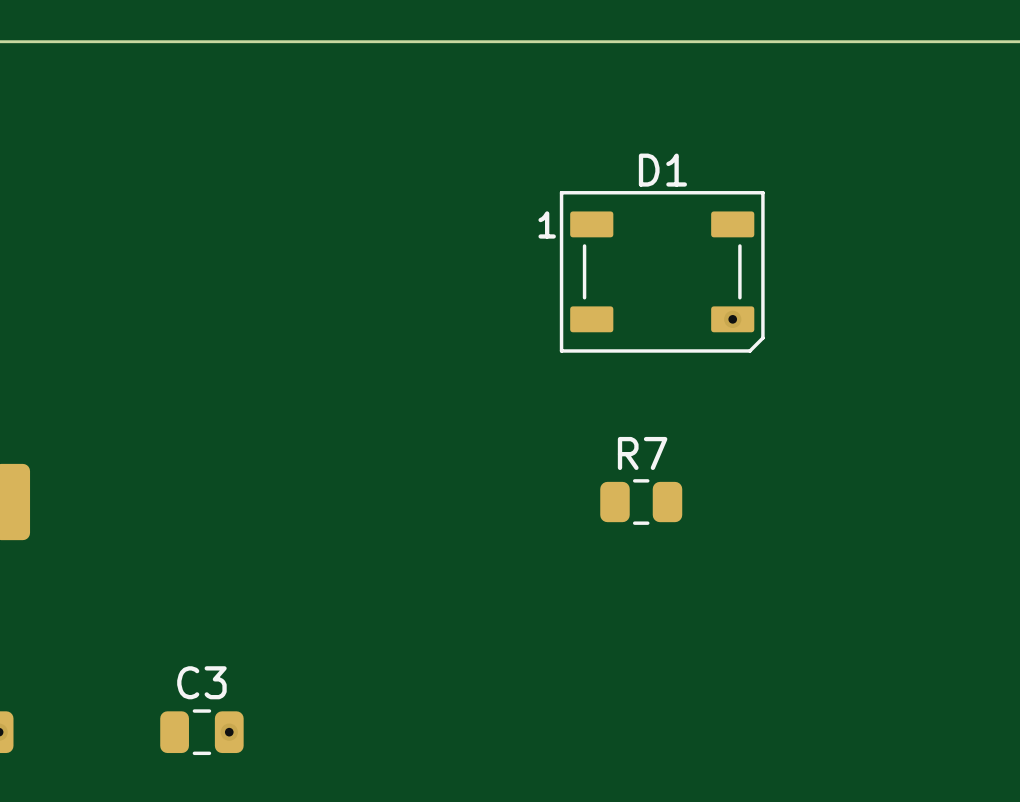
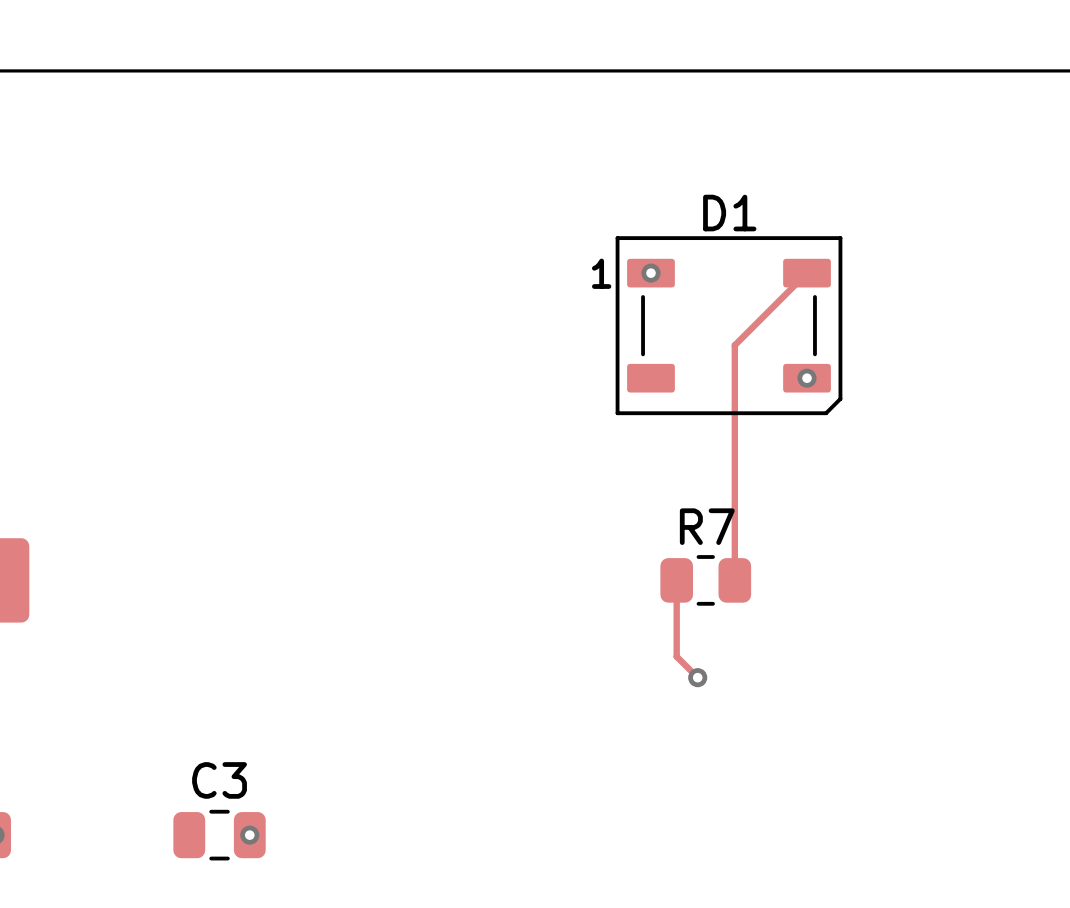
via: none -> (650, 273)
track: none -> (807, 273) (734, 345) (734, 580)
track: none -> (676, 580) (676, 656) (697, 677)
via: none -> (697, 677)

